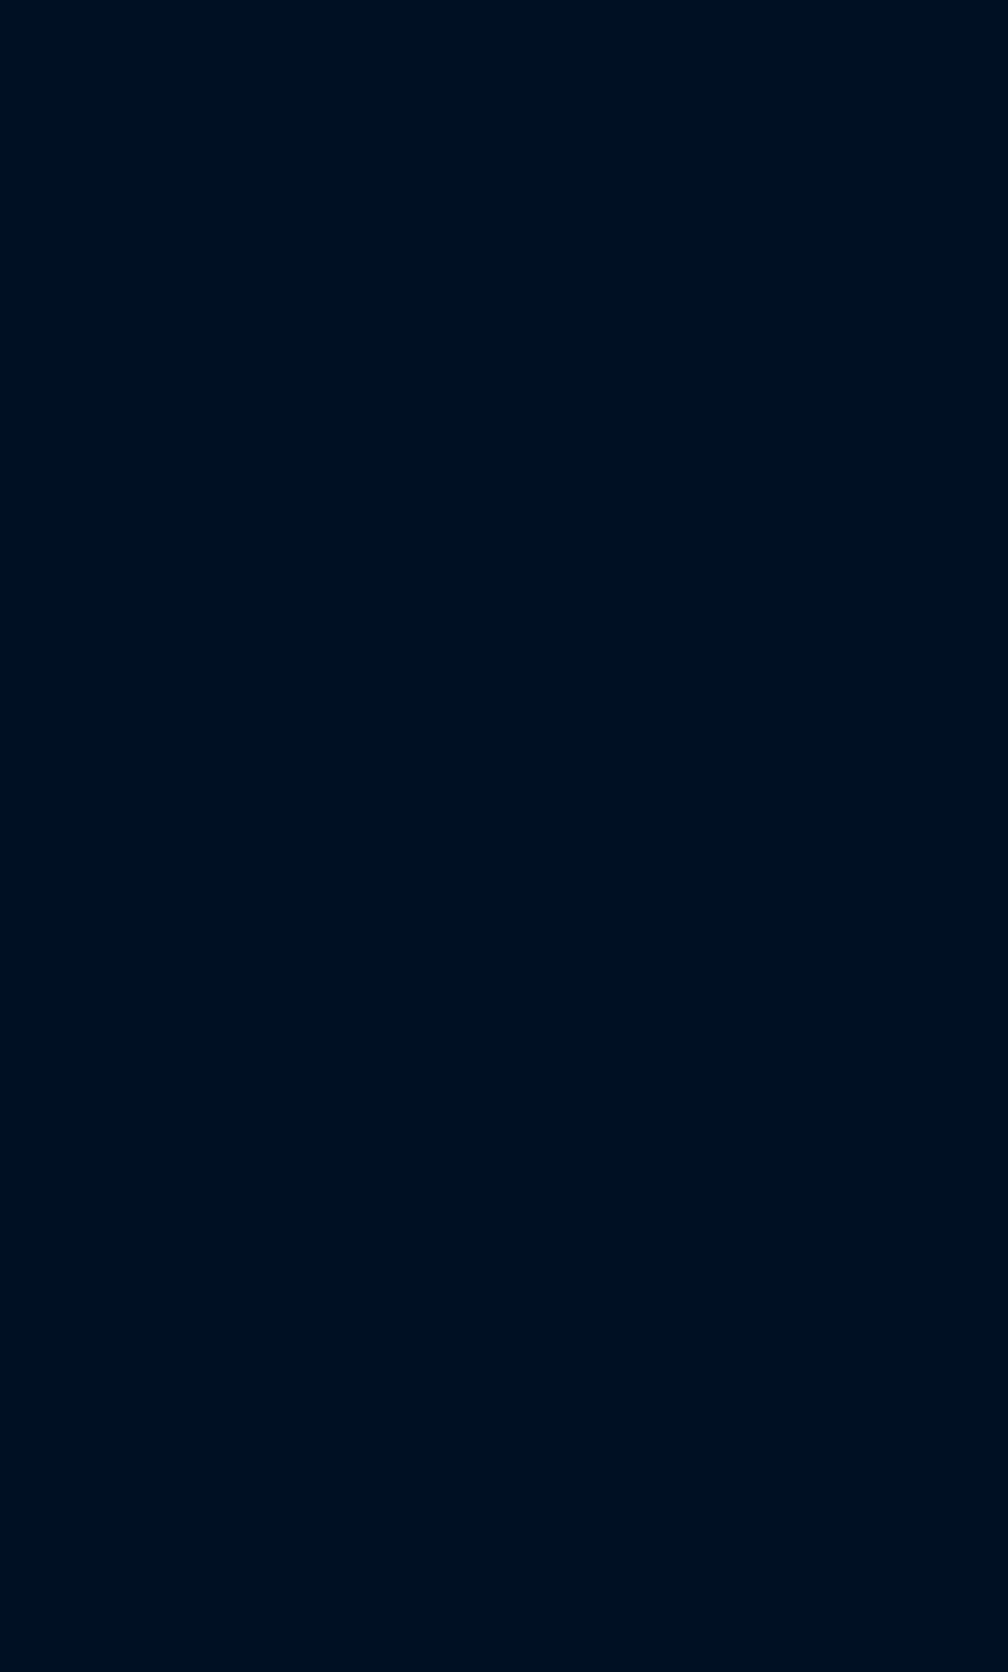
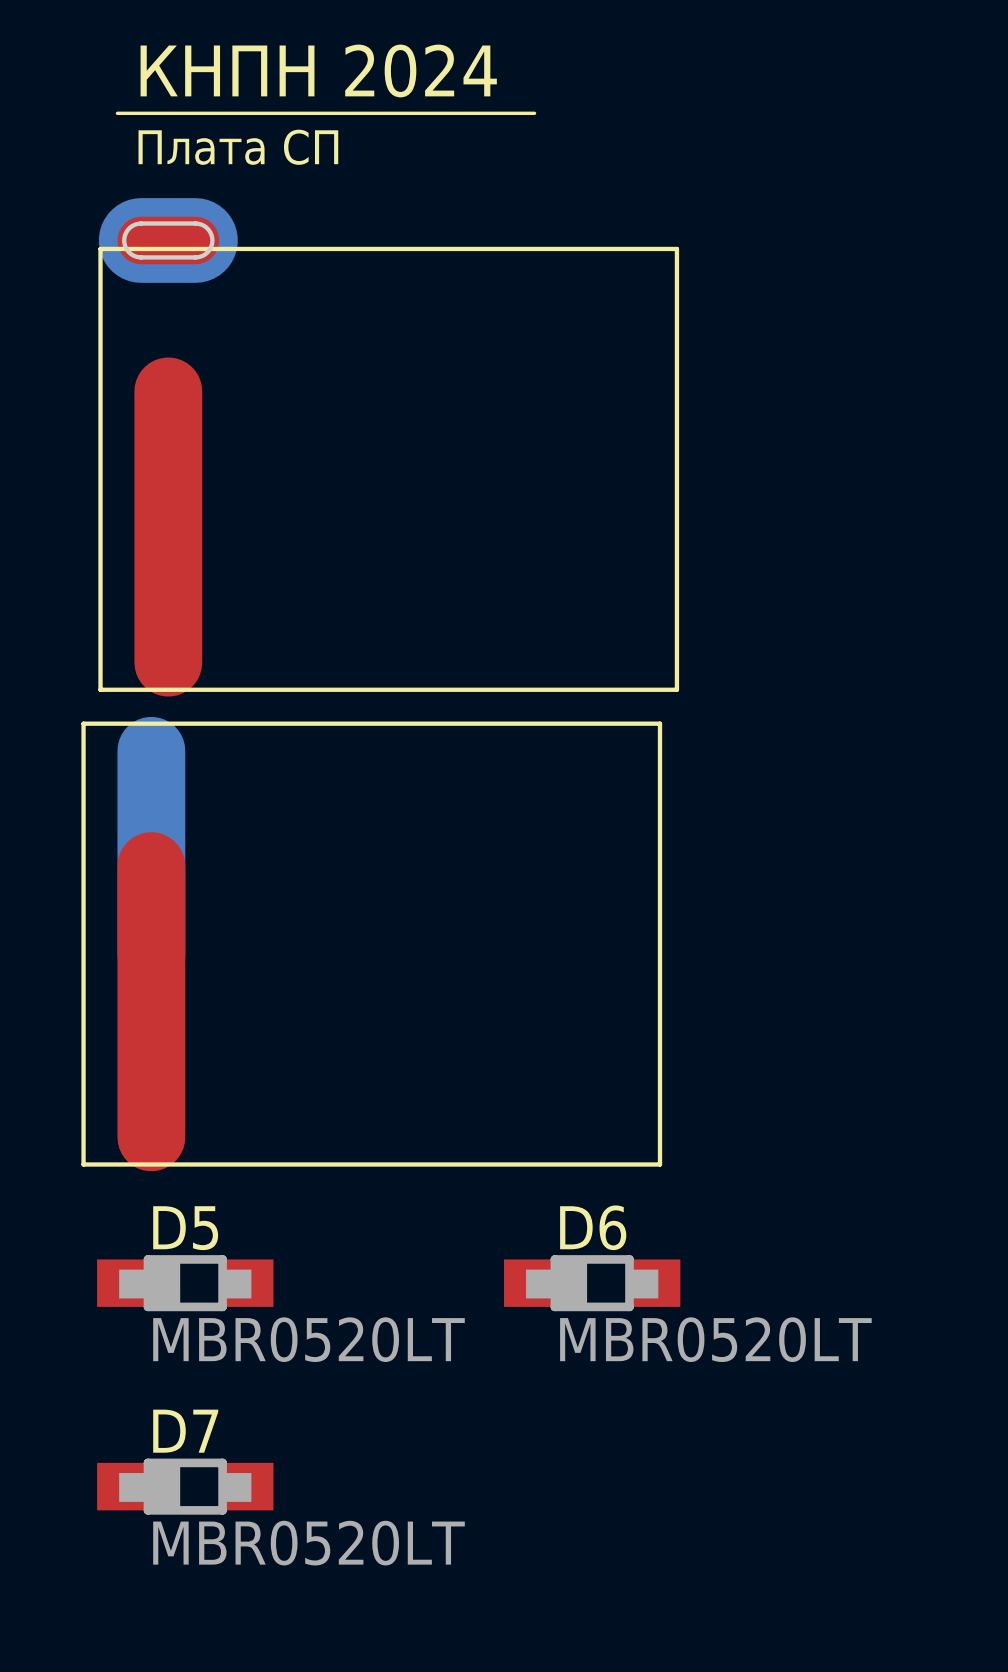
drawing: none -> [115, 111, 537, 116]
part: none -> (388, 447)
part: none -> (371, 944)
D5: none -> MBR0520LT (185, 1283)
D6: none -> MBR0520LT (592, 1283)
D7: none -> MBR0520LT (185, 1486)

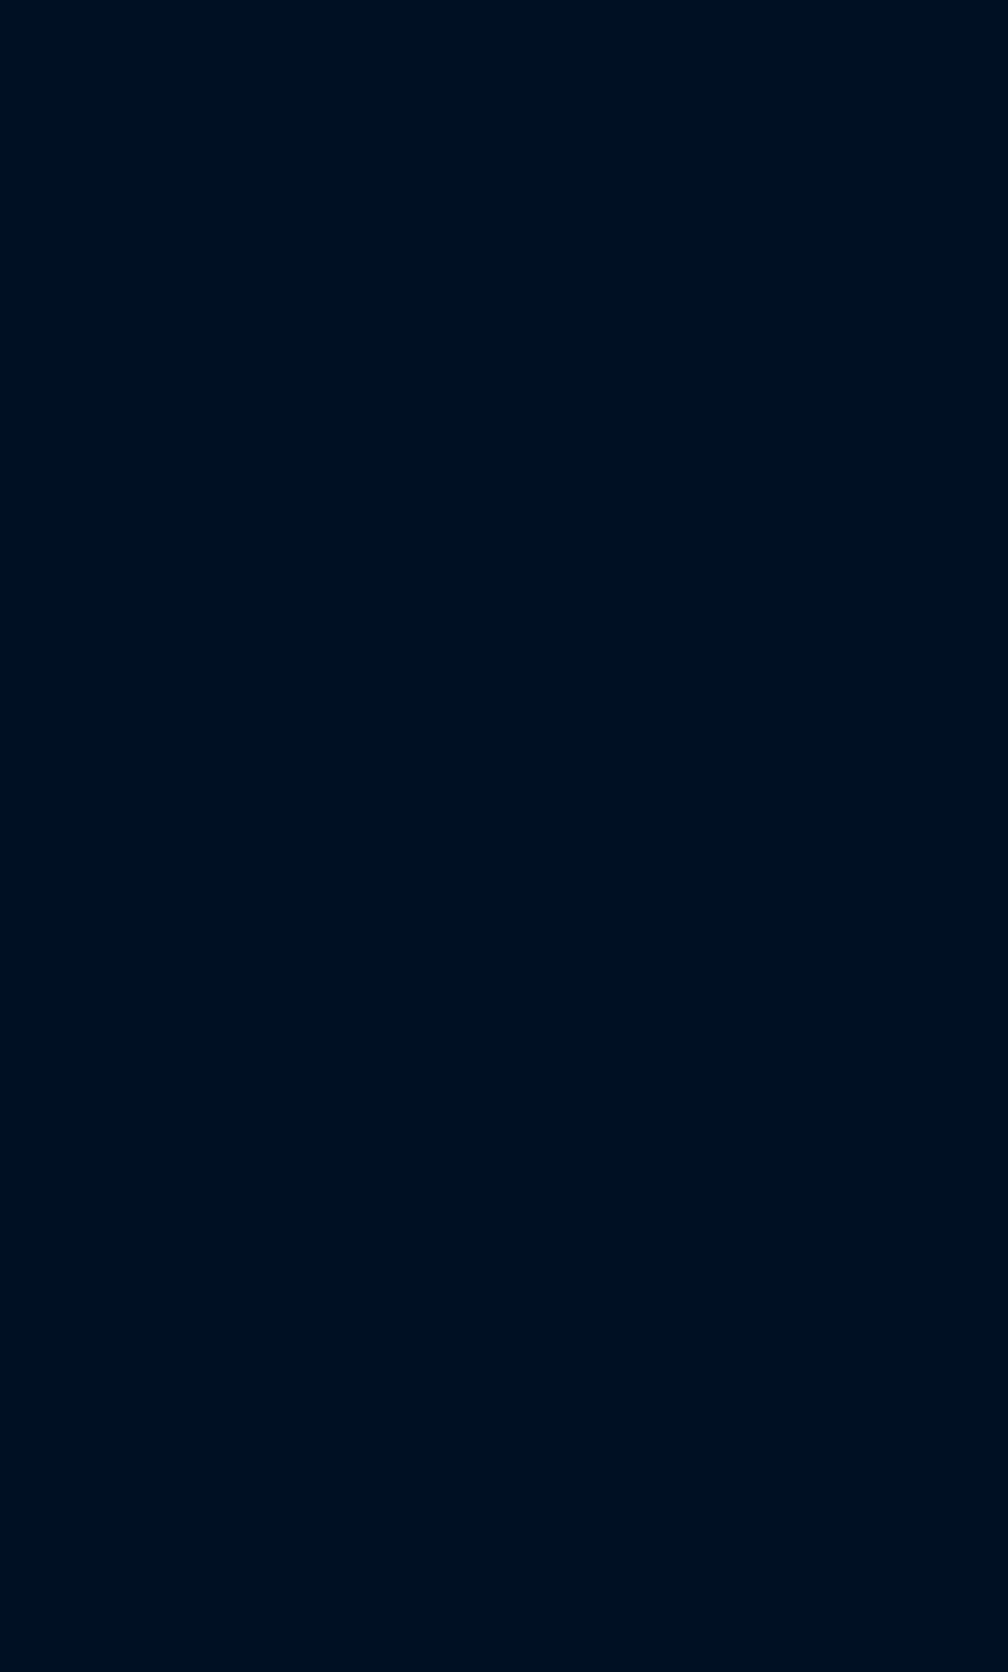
drawing: [115, 111, 537, 116] -> none
part: (388, 447) -> none
part: (371, 944) -> none
D5: MBR0520LT (185, 1283) -> none
D6: MBR0520LT (592, 1283) -> none
D7: MBR0520LT (185, 1486) -> none

